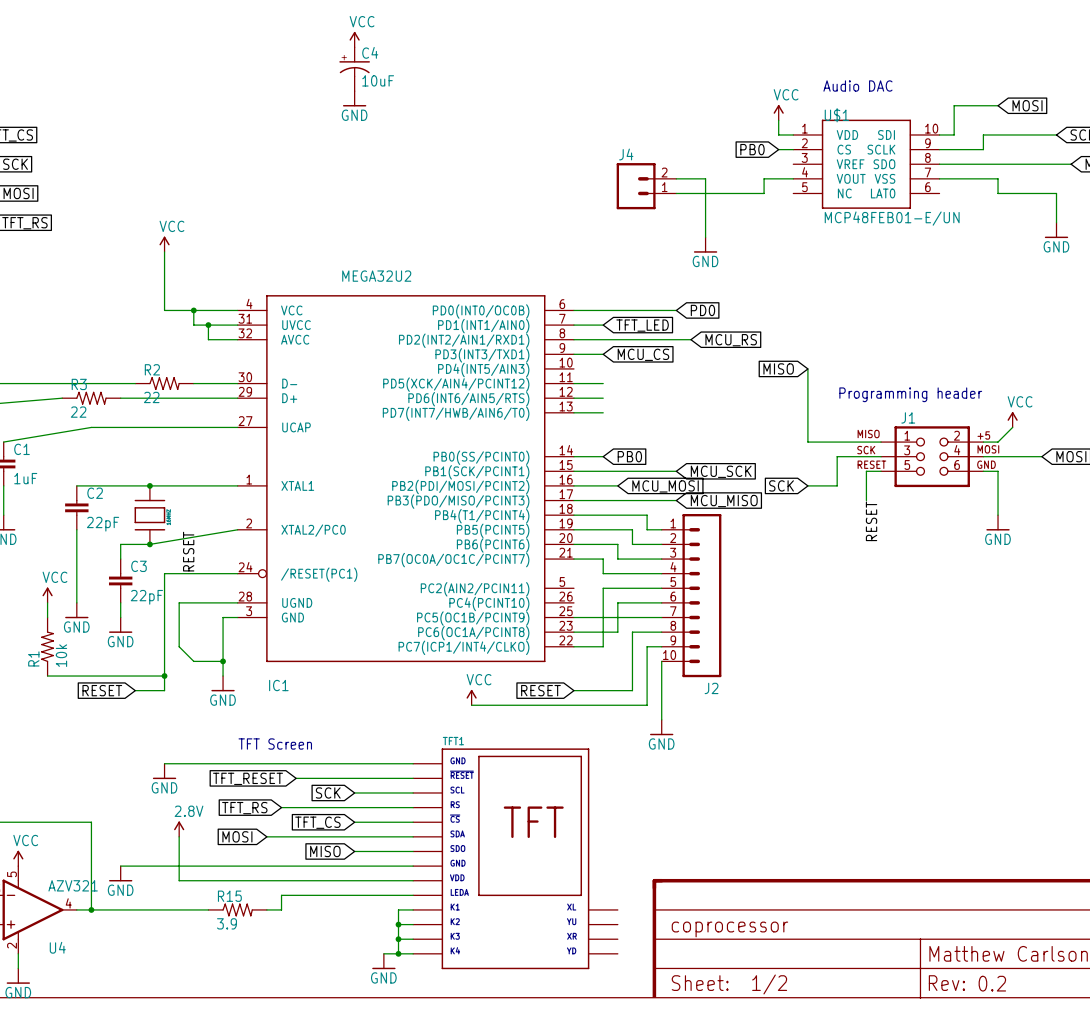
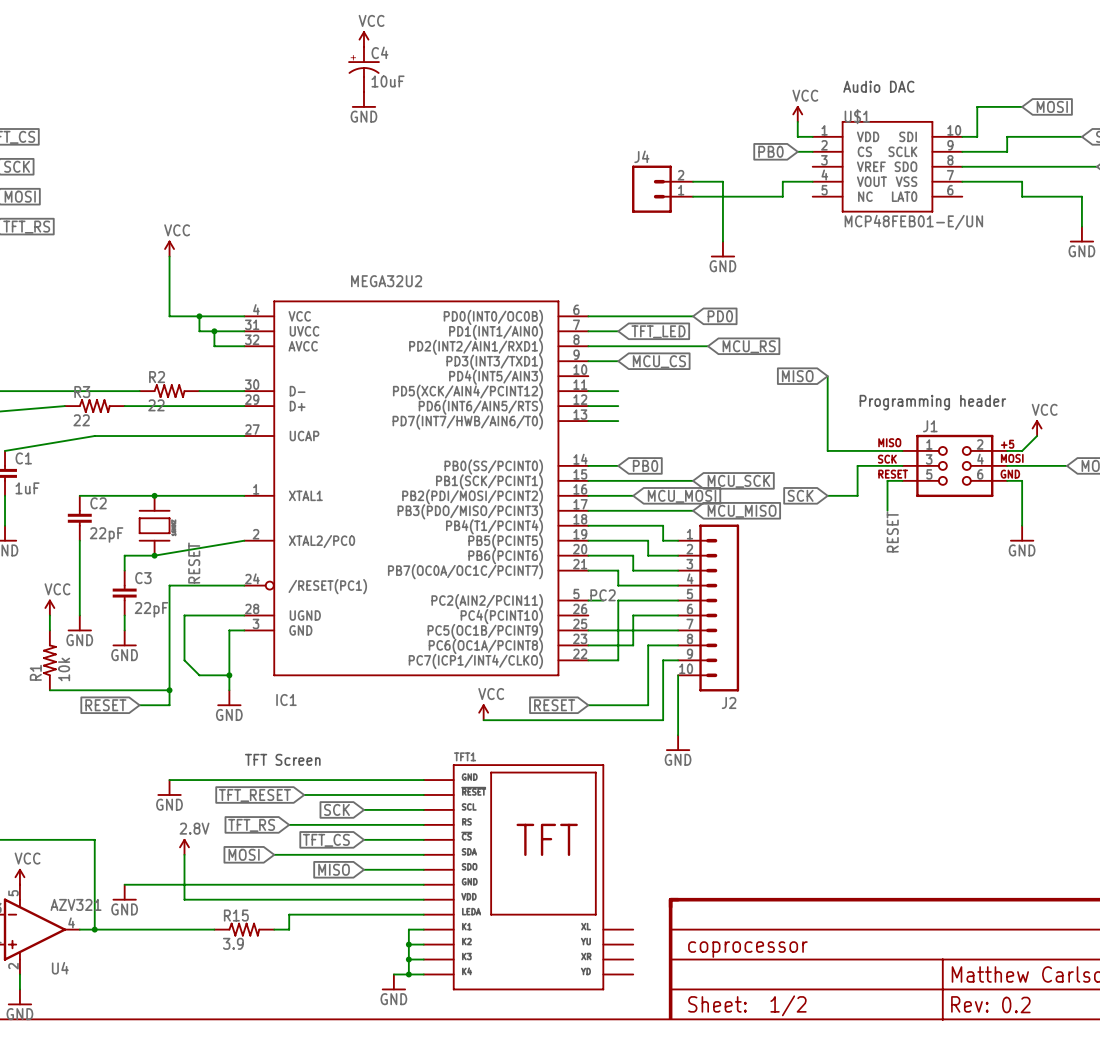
label: none -> PC2 (603, 595)
wire: none -> (588, 600) (603, 600)

